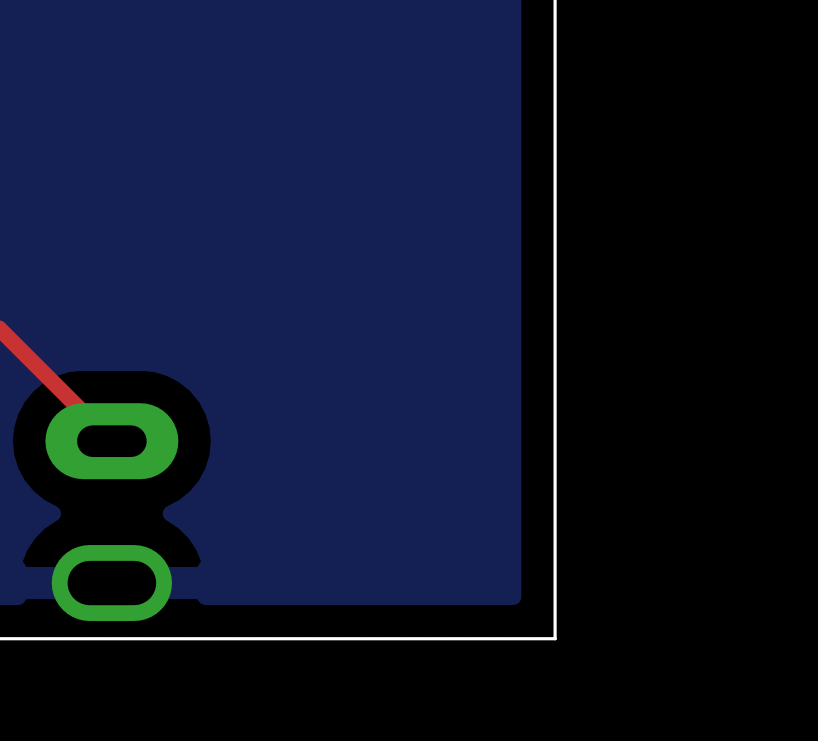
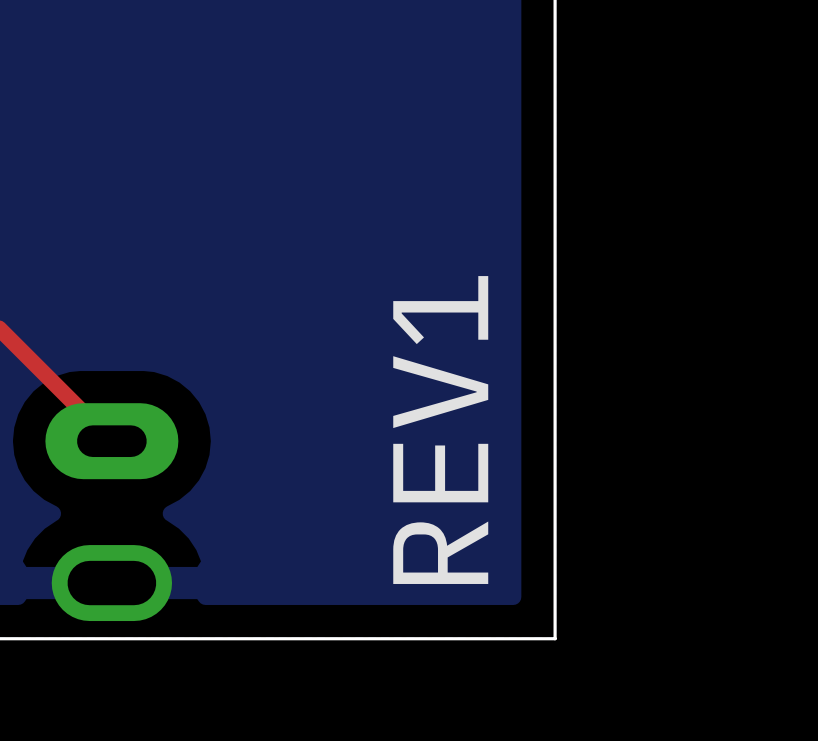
text: none -> REV1 (440, 430)

